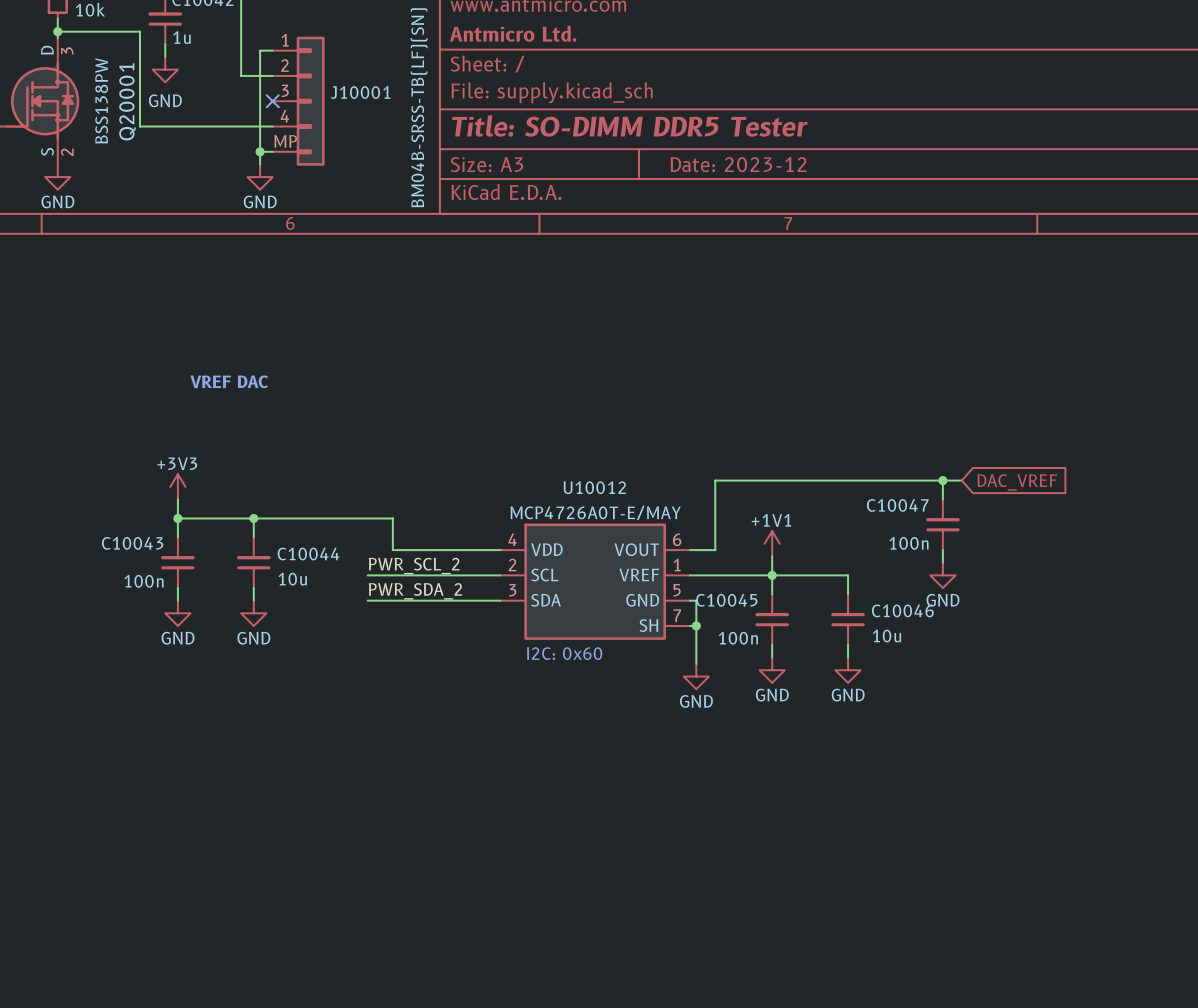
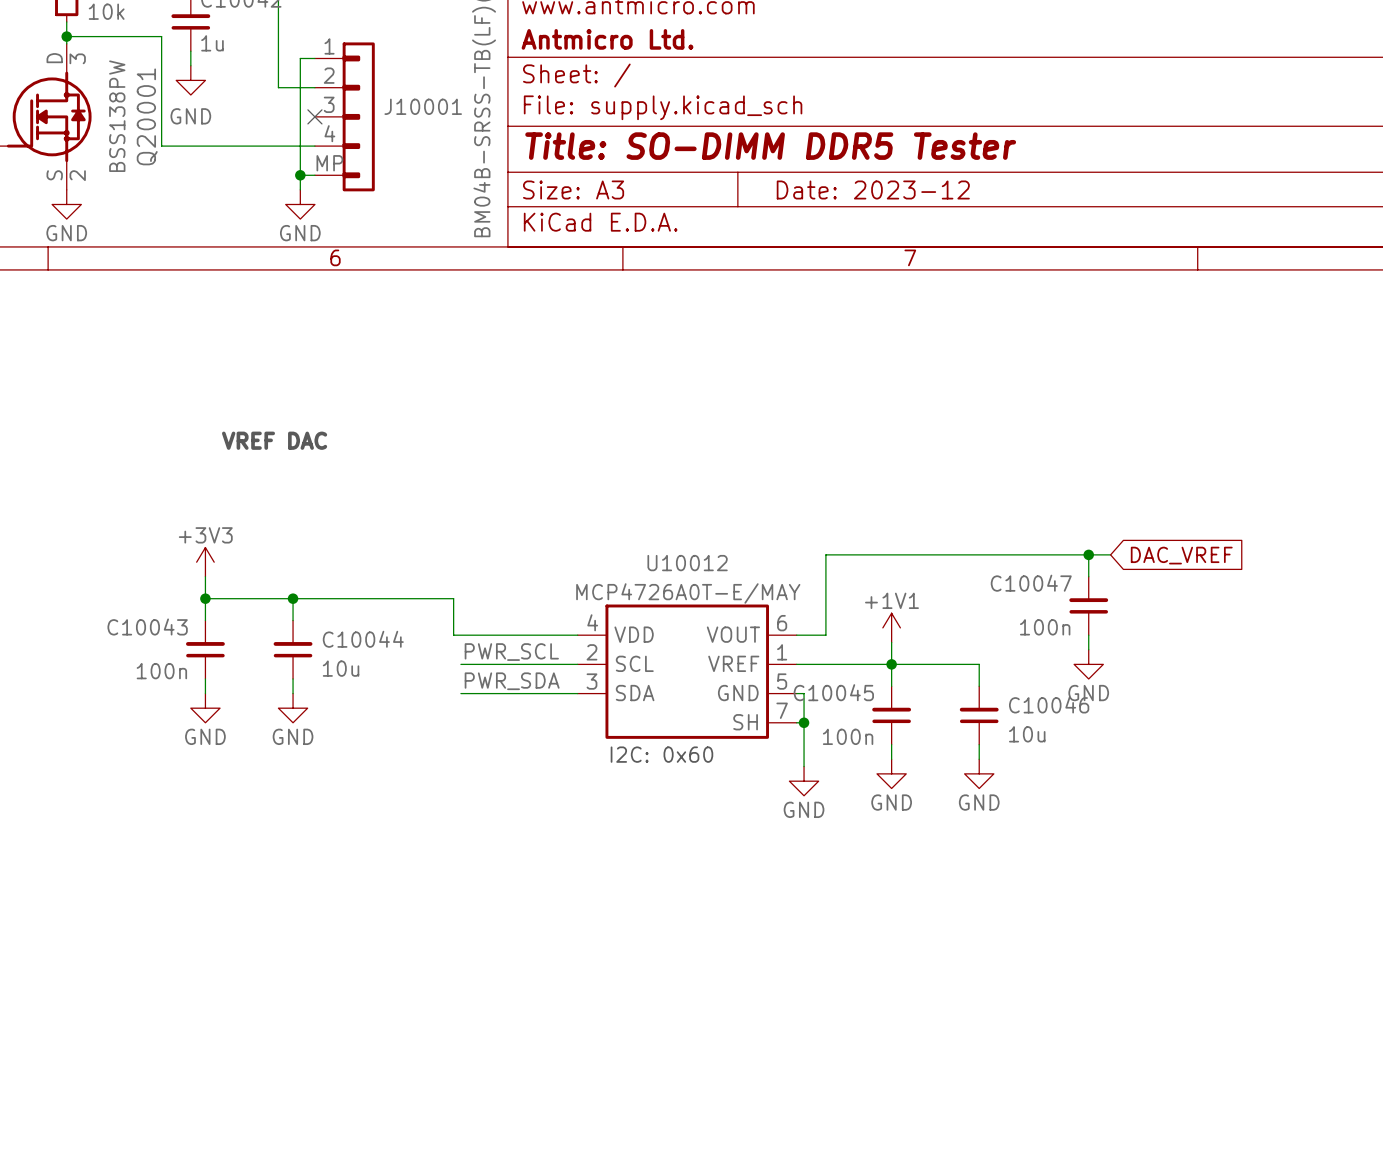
label: PWR_SCL_2 (414, 565) -> none
label: none -> PWR_SCL (511, 652)
wire: (367, 575) (399, 575) -> none
label: PWR_SDA_2 (415, 591) -> none
label: none -> PWR_SDA (512, 681)
wire: (367, 600) (399, 600) -> none

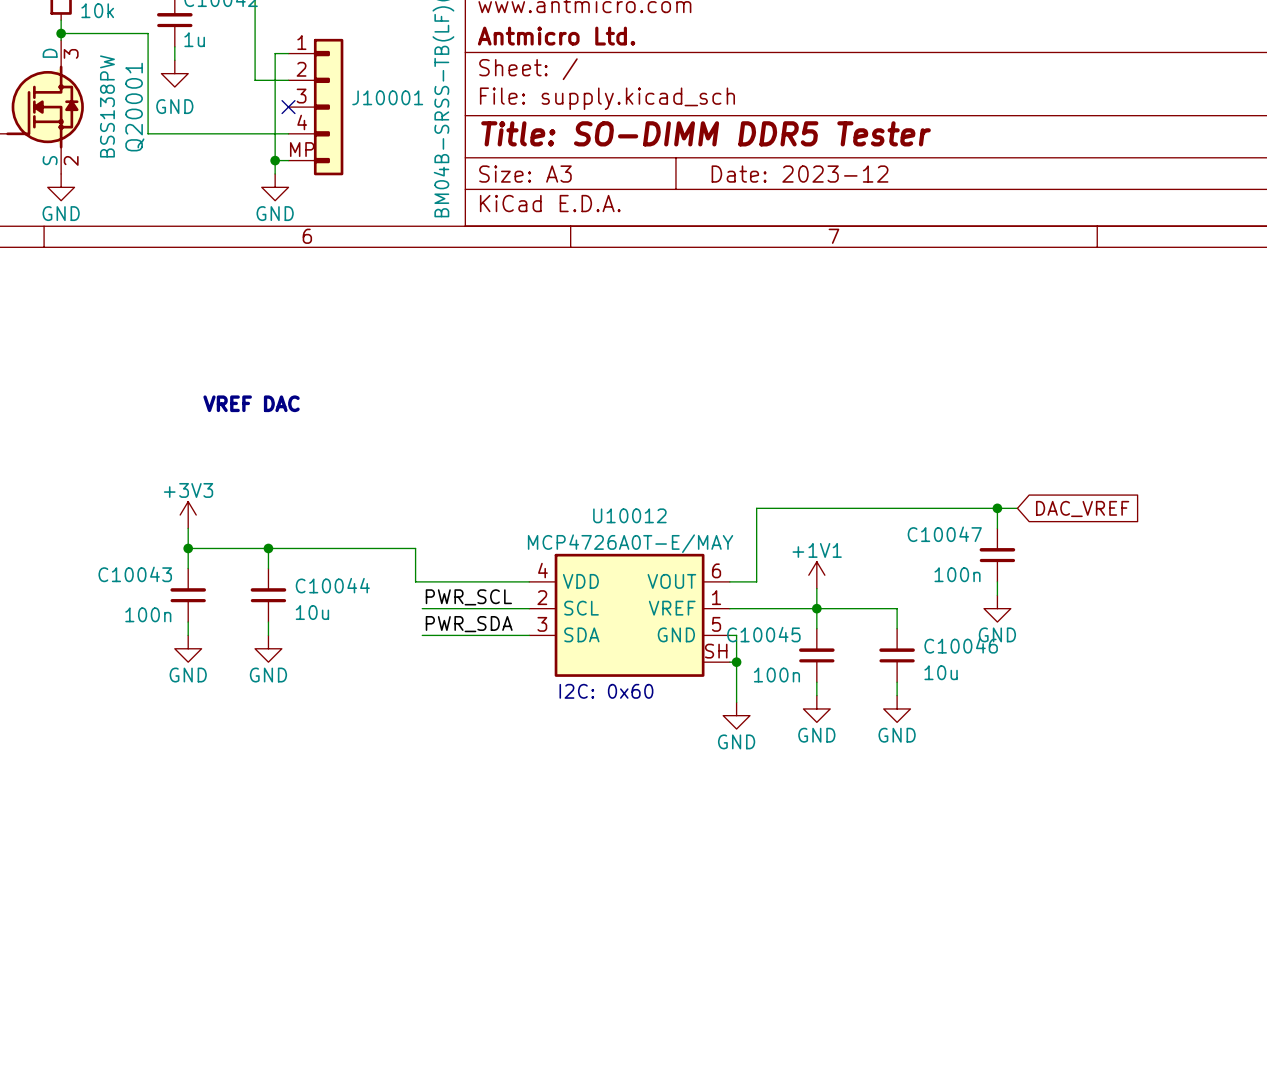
U10012 pin number: 7 (782, 710) -> SH (716, 651)
U10012 pin name: SH (745, 722) -> none

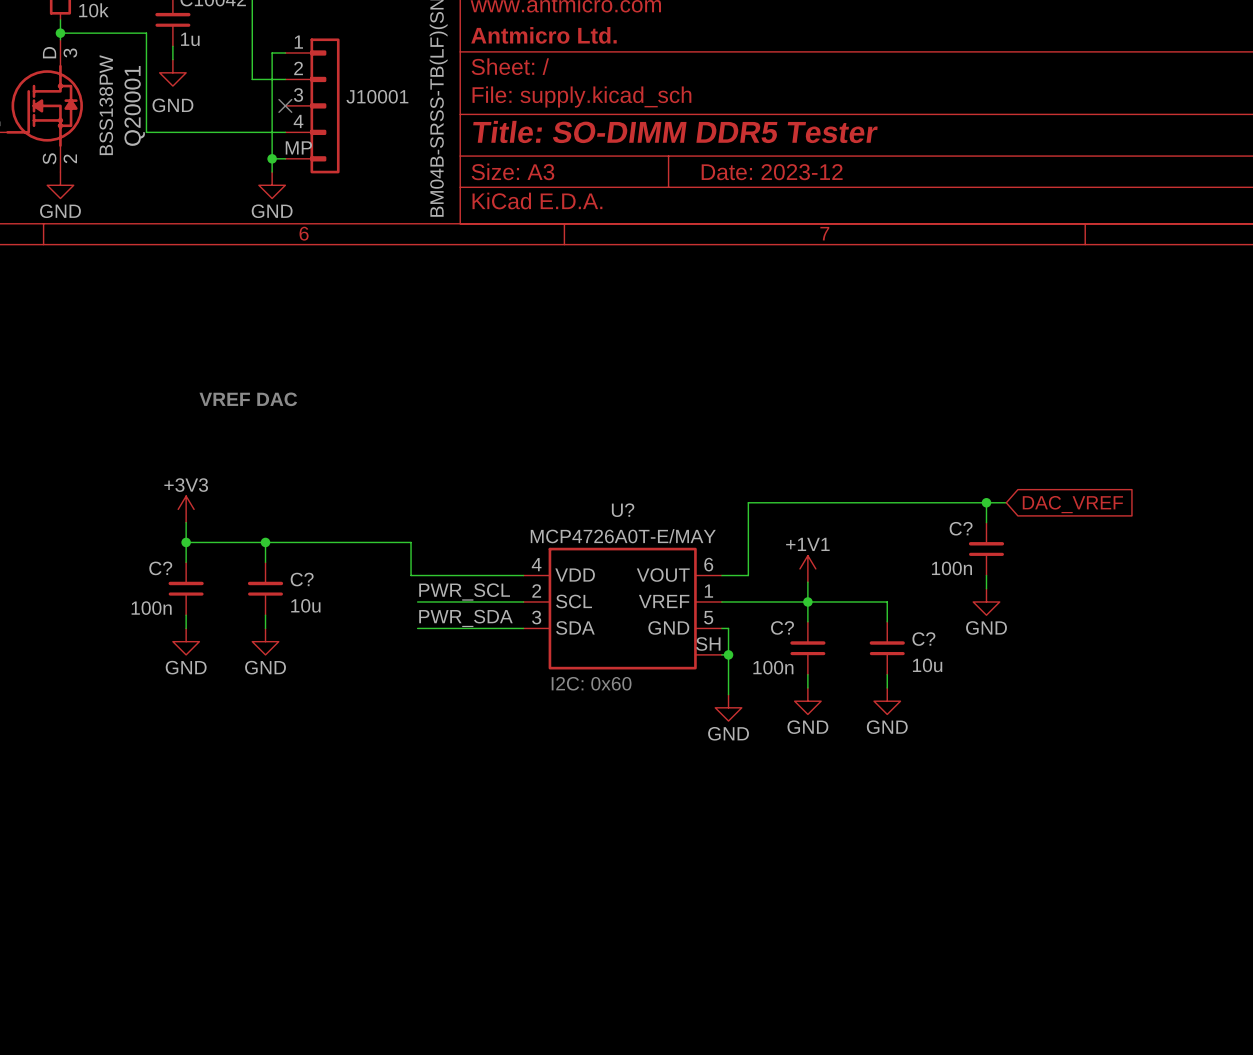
U10012 name: U10012 (629, 515) -> U? (623, 510)
C10047 name: C10047 (944, 534) -> C? (961, 528)
C10043 name: C10043 (135, 574) -> C? (160, 568)
C10044 name: C10044 (332, 585) -> C? (302, 579)
C10045 name: C10045 (763, 634) -> C? (782, 627)
C10046 name: C10046 (961, 645) -> C? (923, 639)

